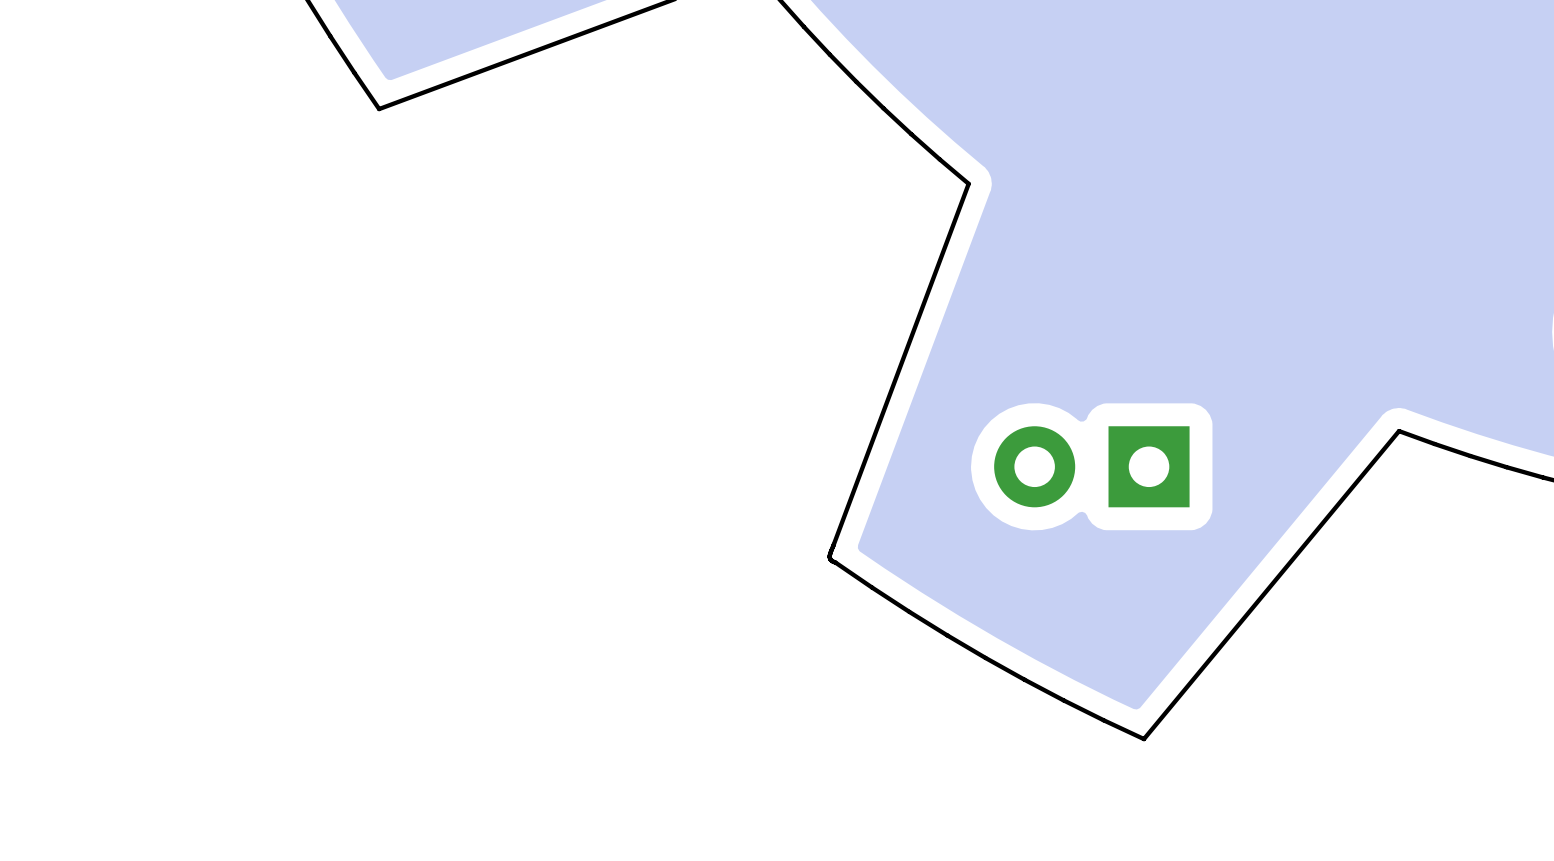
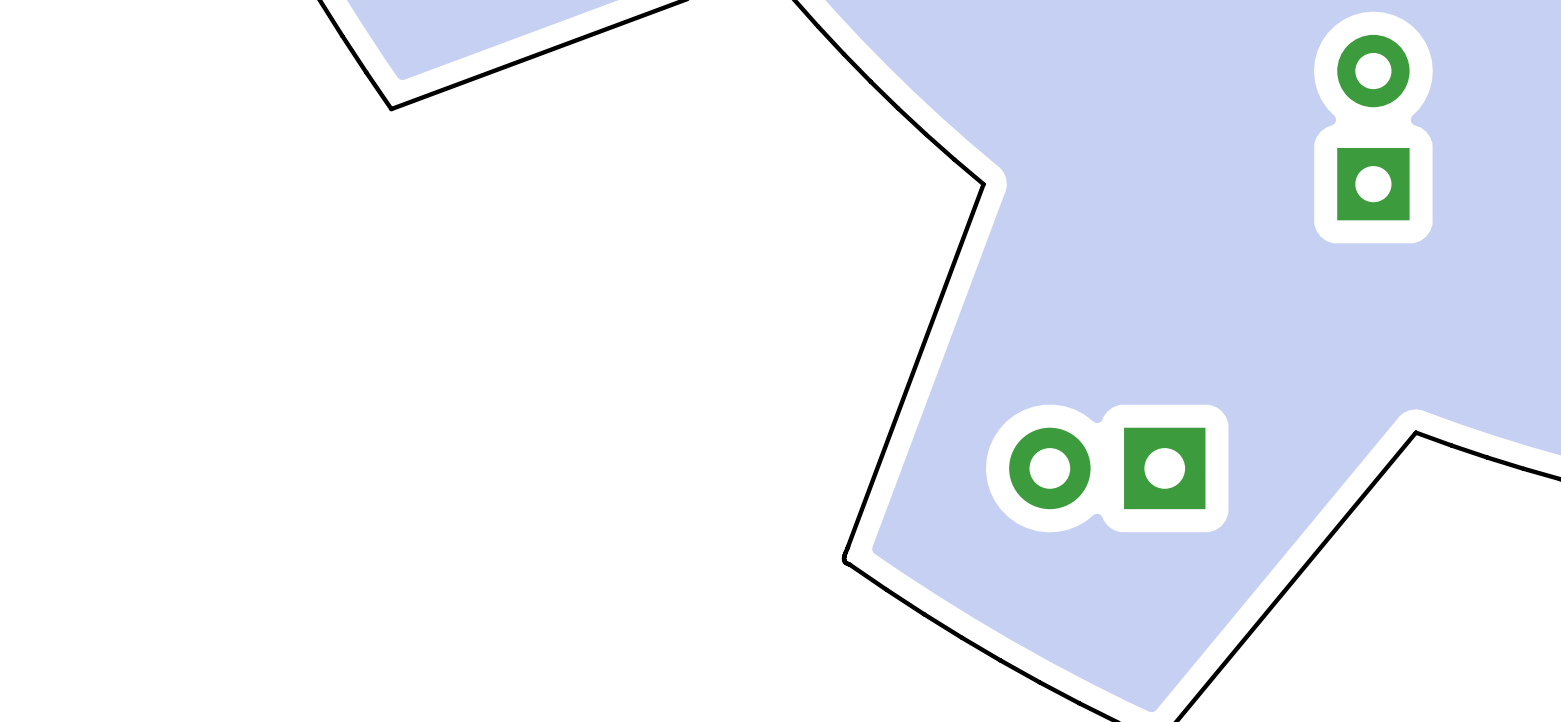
part: none -> (1373, 127)

